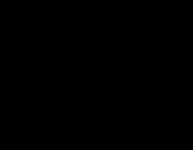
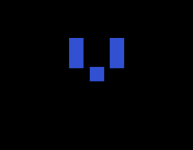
part: none -> (96, 59)

